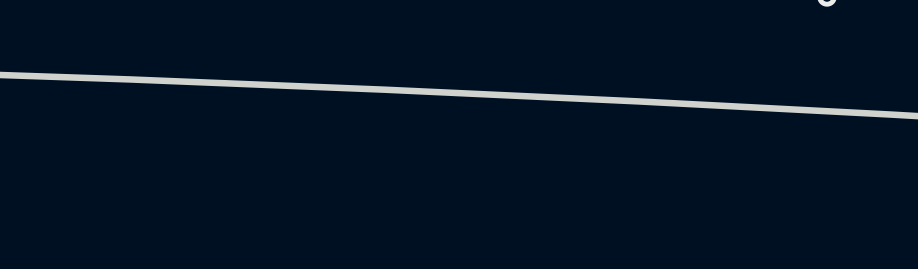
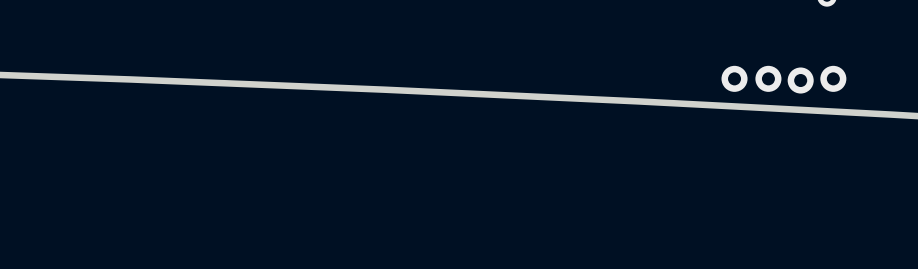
via: none -> (734, 78)
via: none -> (768, 78)
via: none -> (833, 78)
via: none -> (800, 80)

